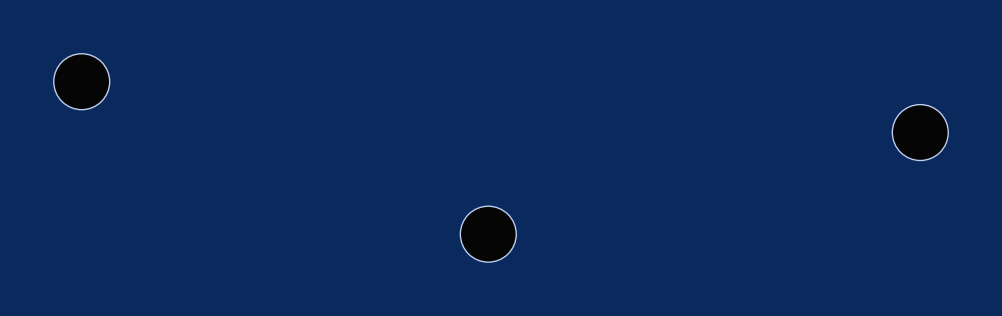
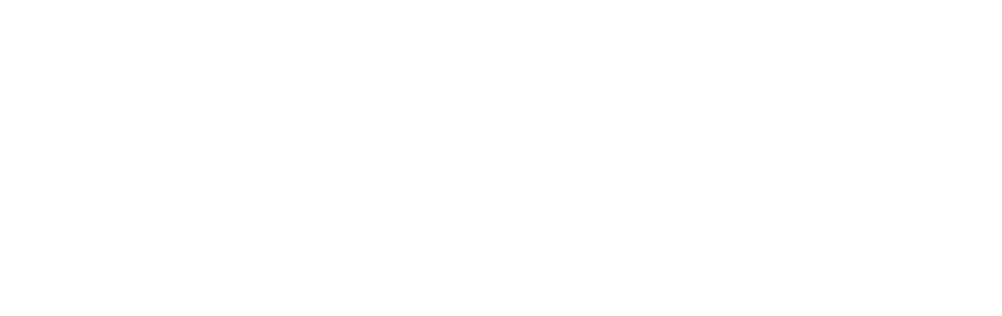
part: (81, 81) -> none
part: (920, 132) -> none
part: (488, 234) -> none

